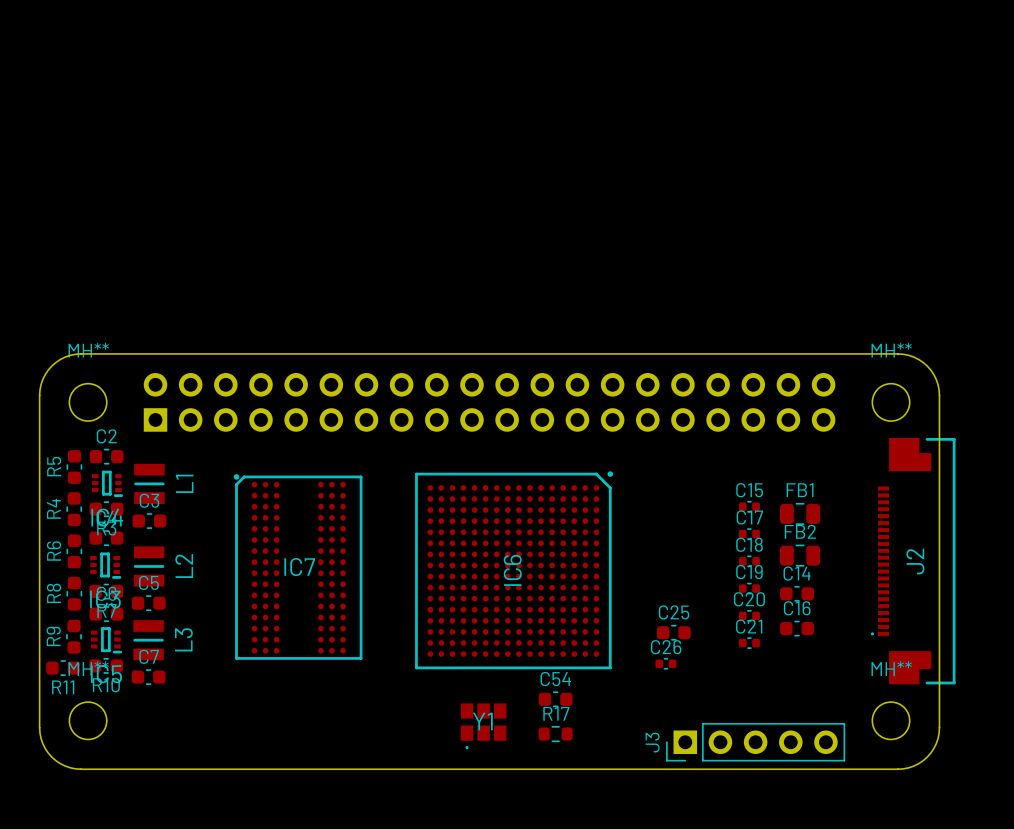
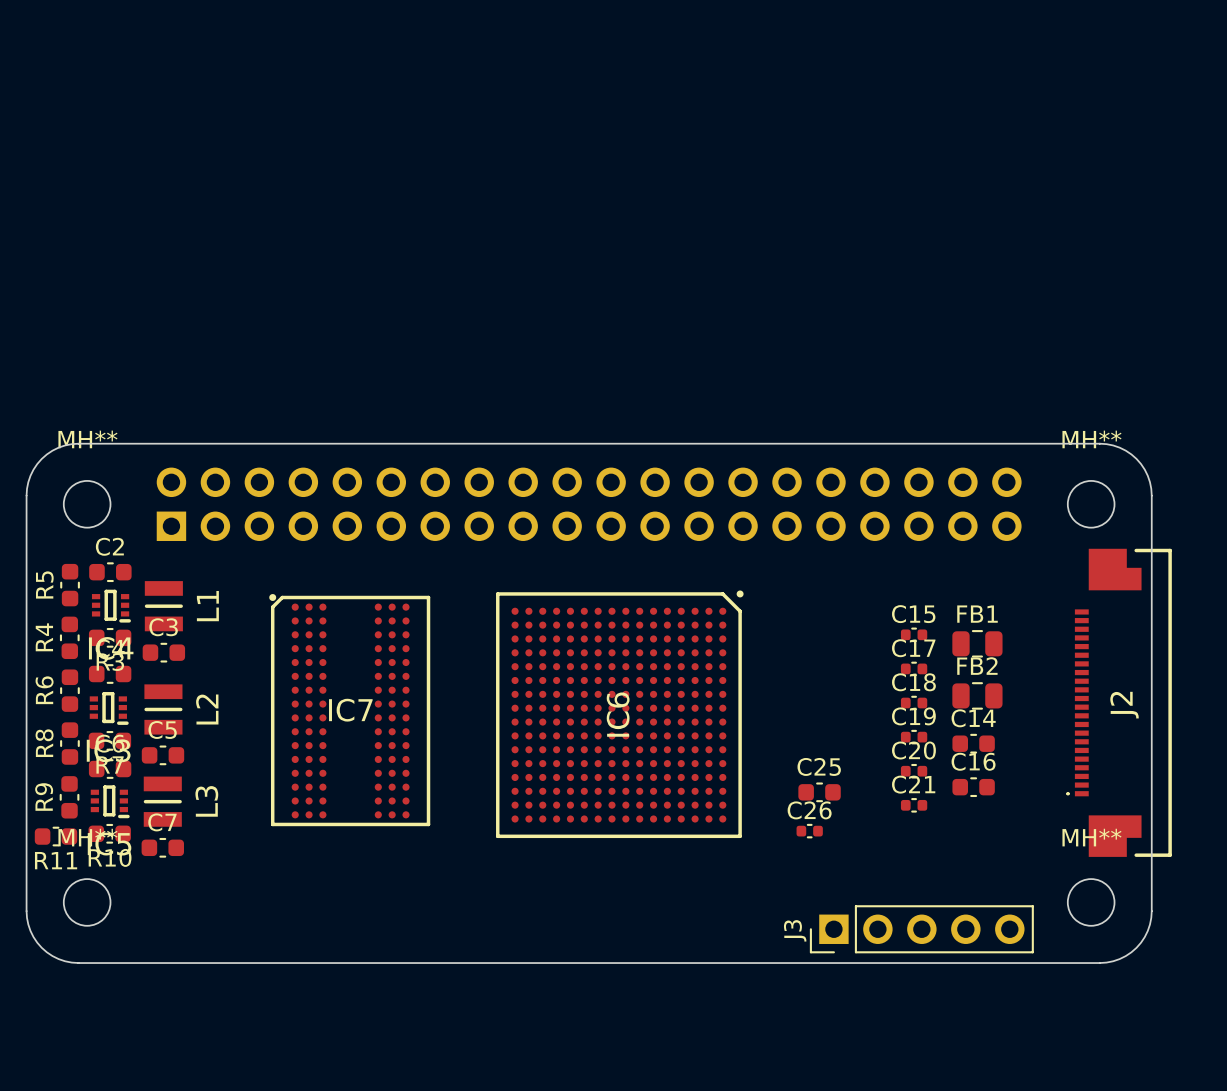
C54: (555, 699) -> none
Y1: (483, 726) -> none
R17: (555, 734) -> none

